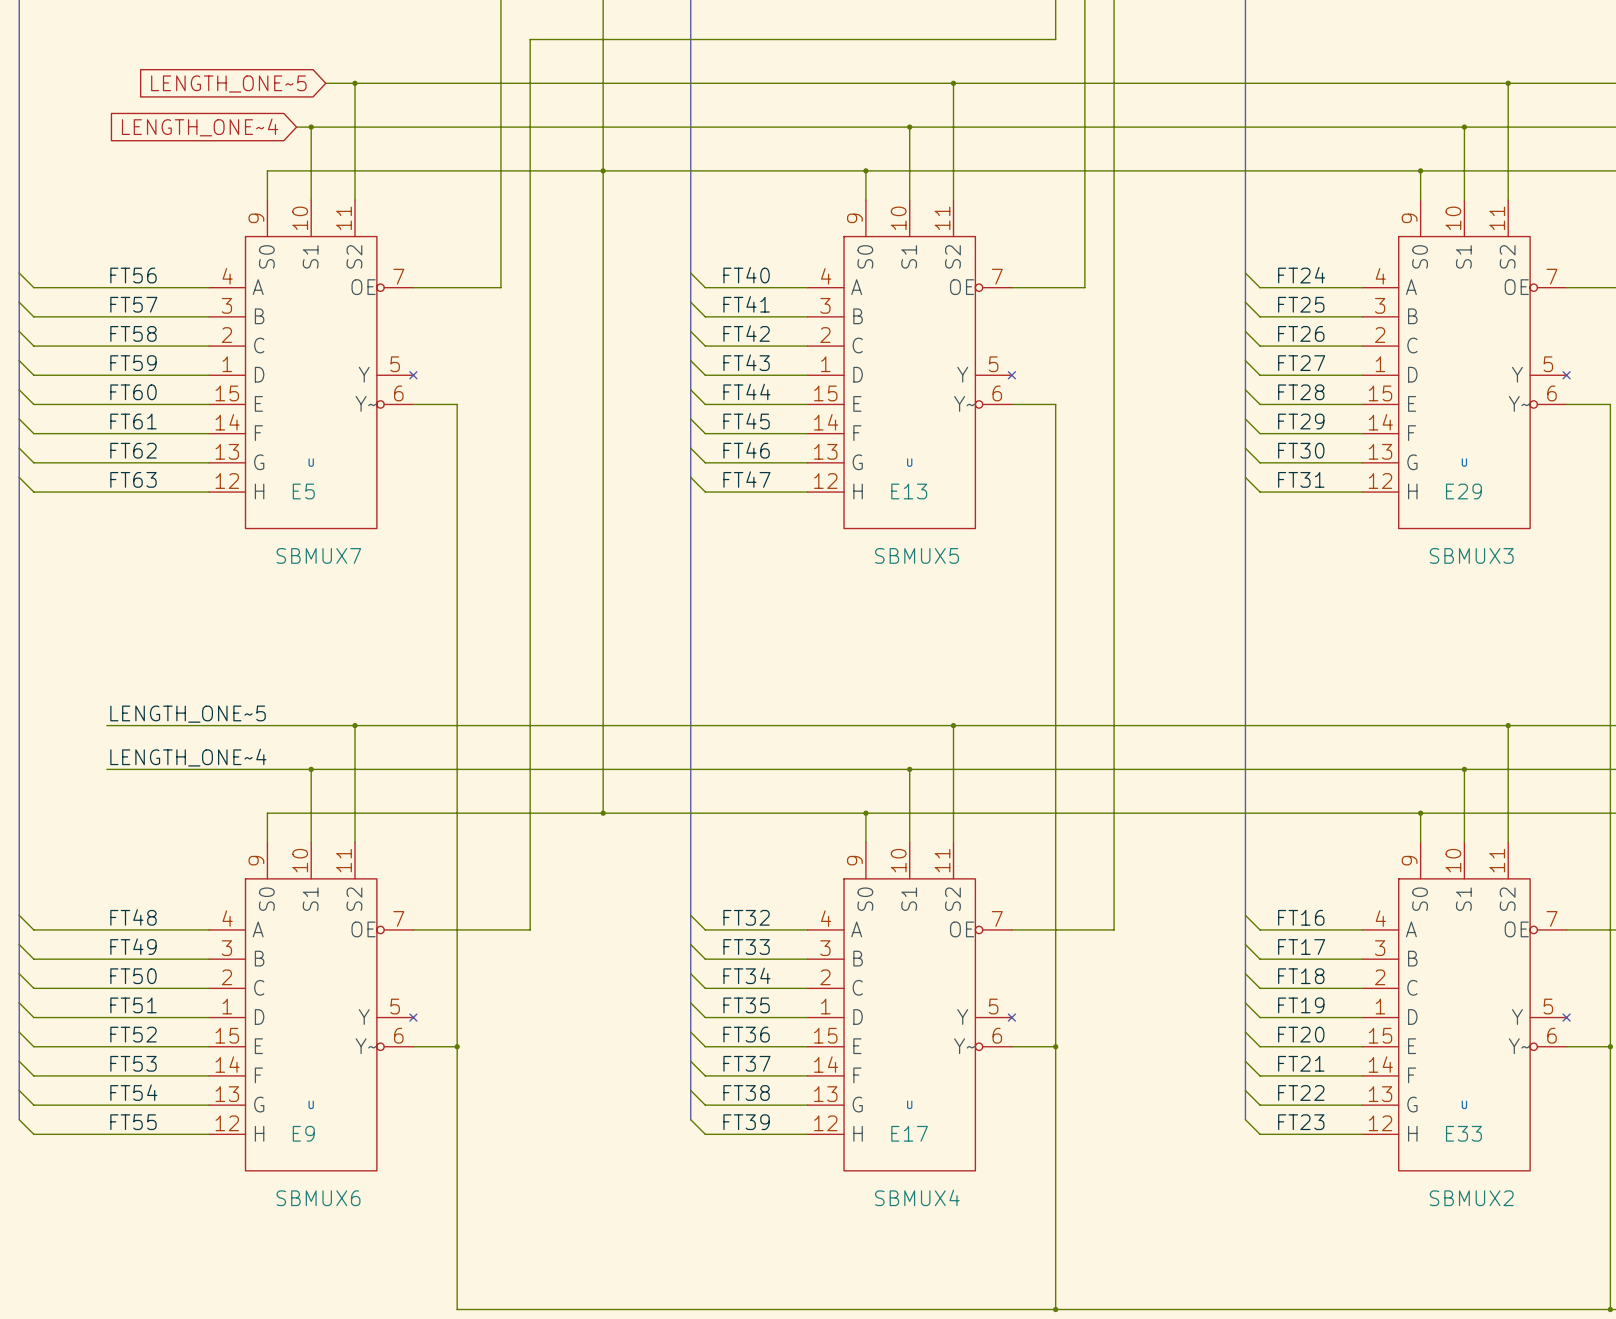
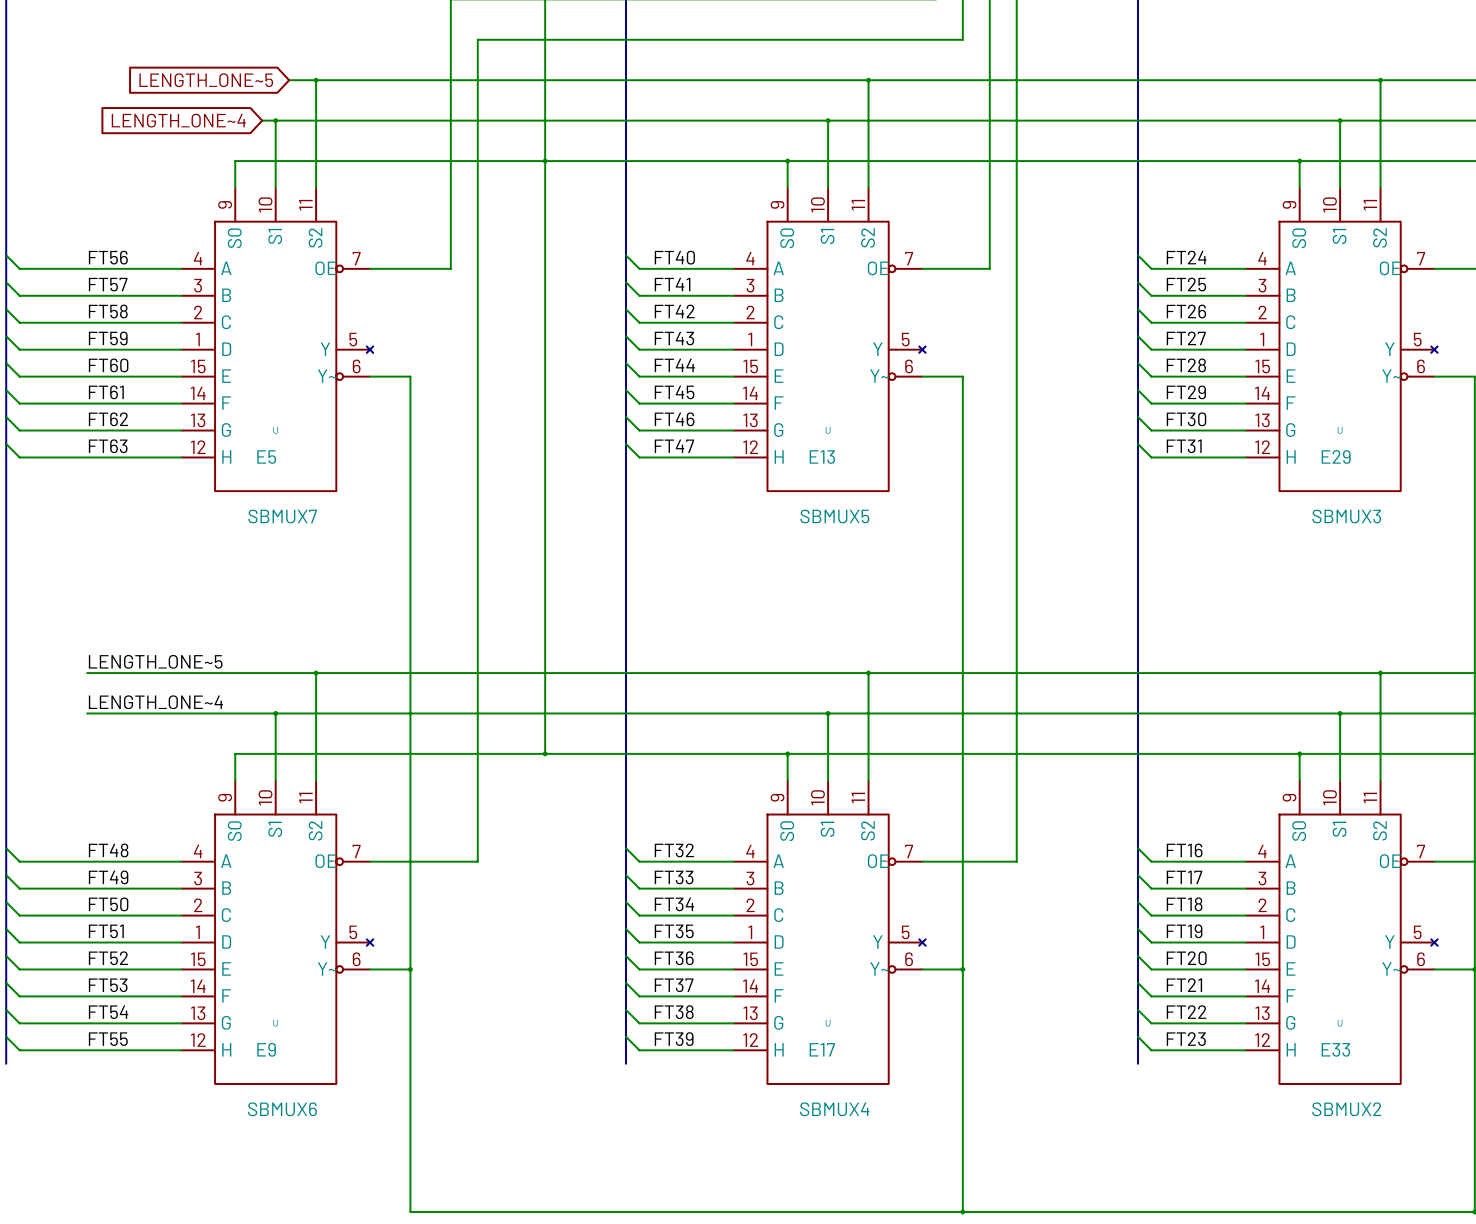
bus: none -> (6, 1036) (6, 1063)
bus: none -> (626, 1036) (626, 1063)
bus: none -> (1137, 1036) (1137, 1063)

